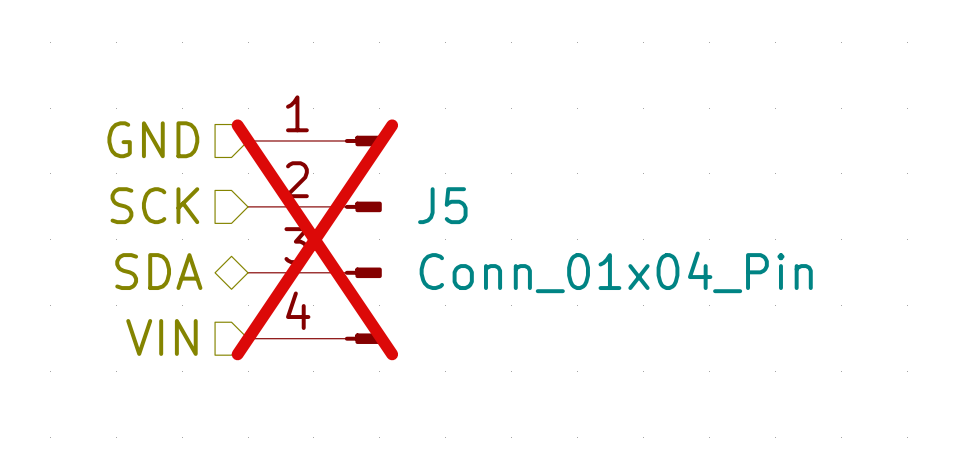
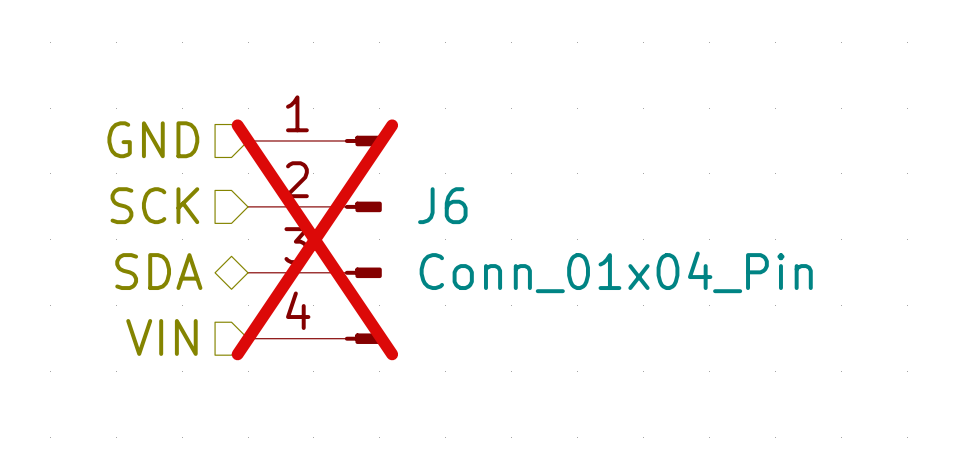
J5 name: J5 (442, 205) -> J6 (442, 205)

